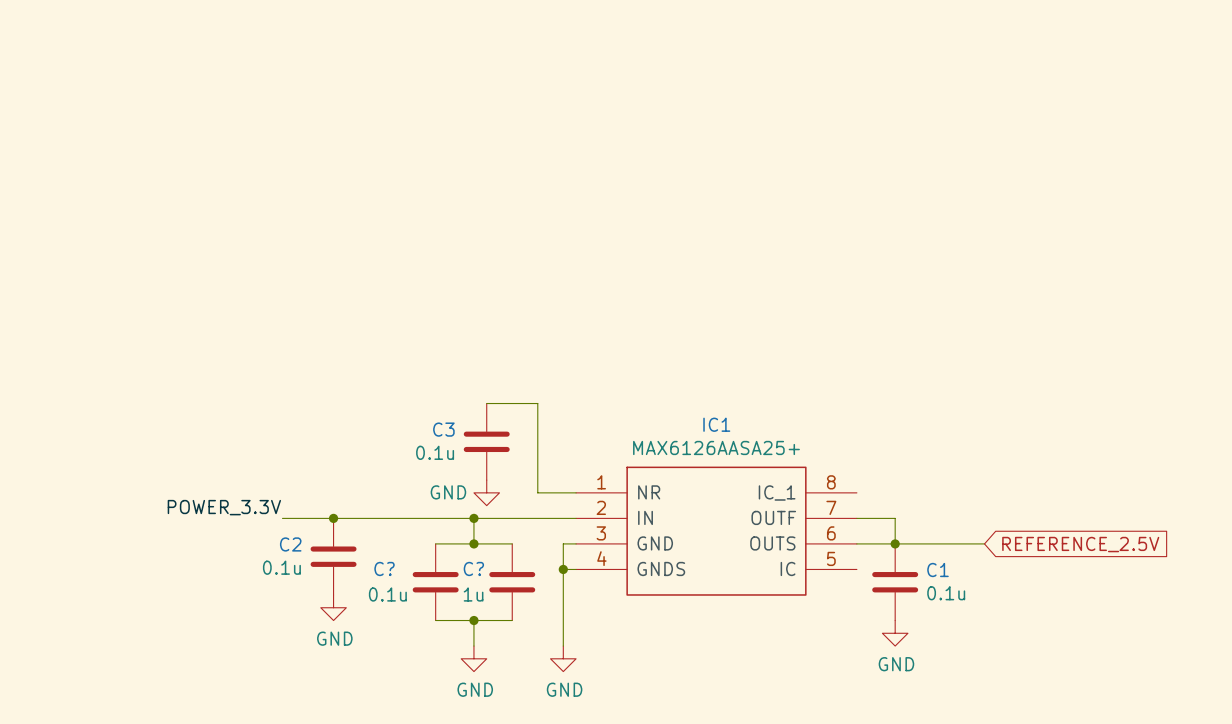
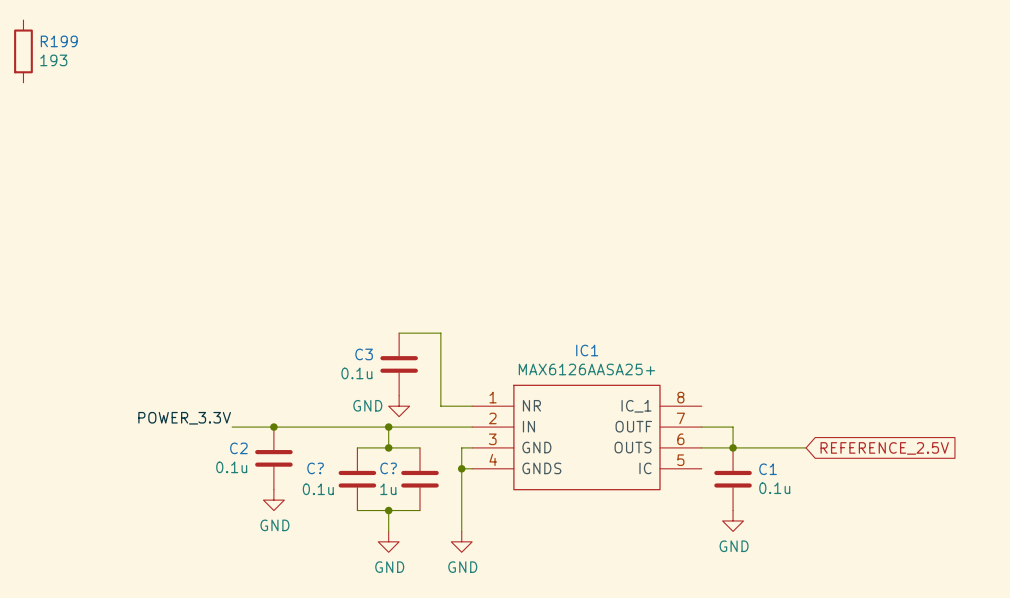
R199: none -> 193 (23, 51)

